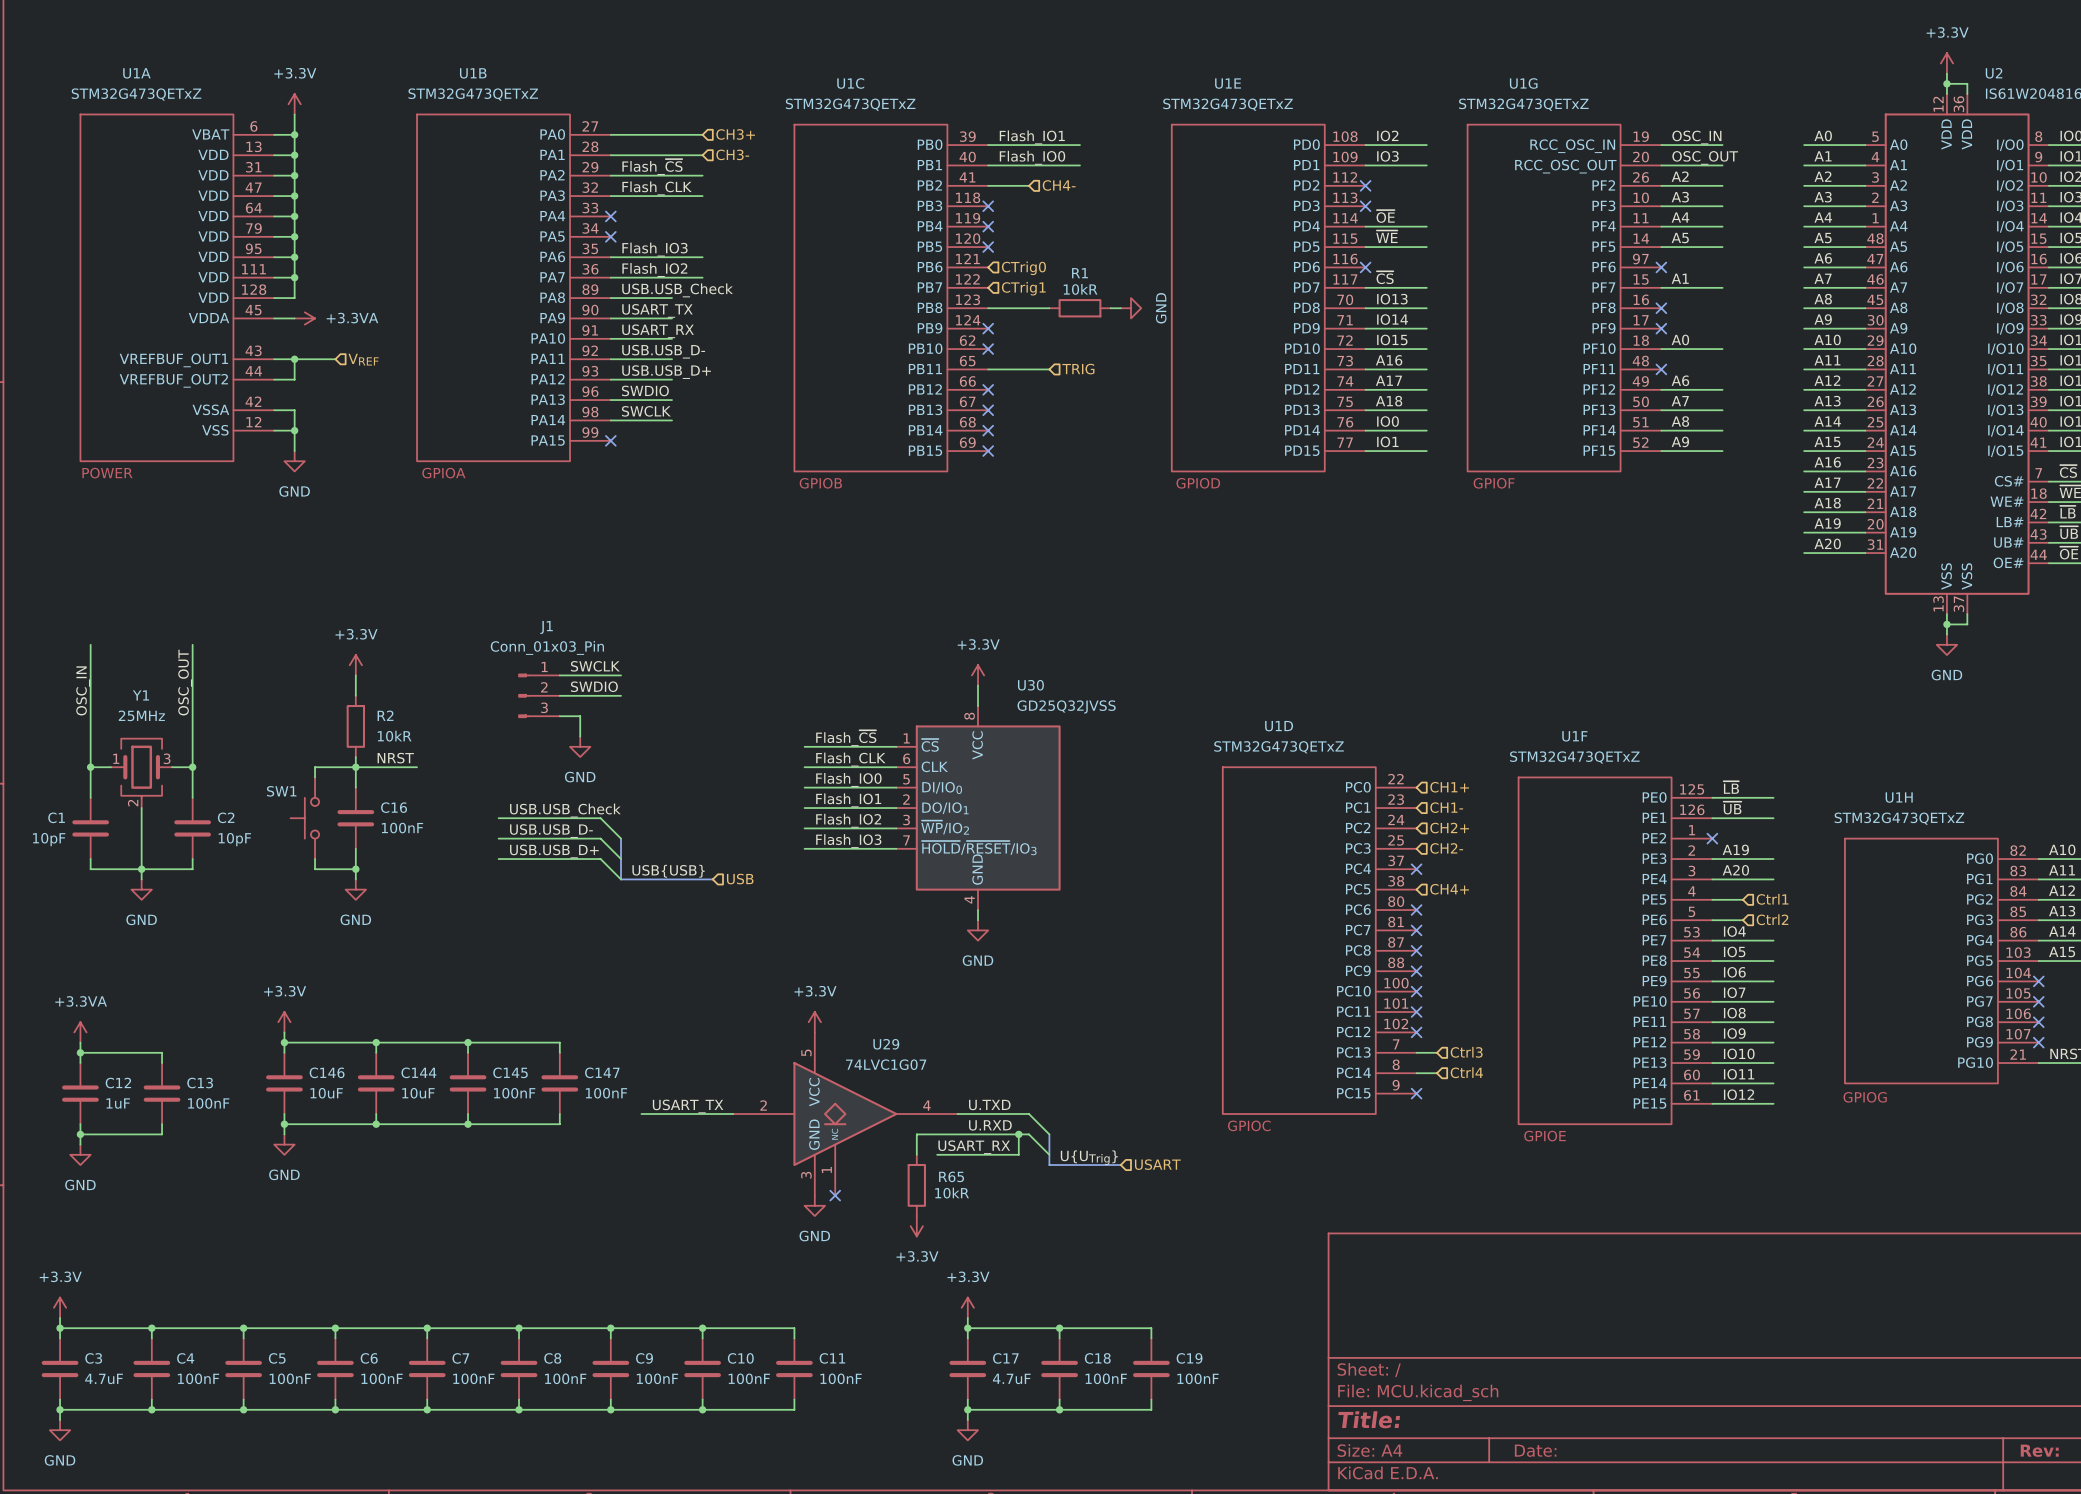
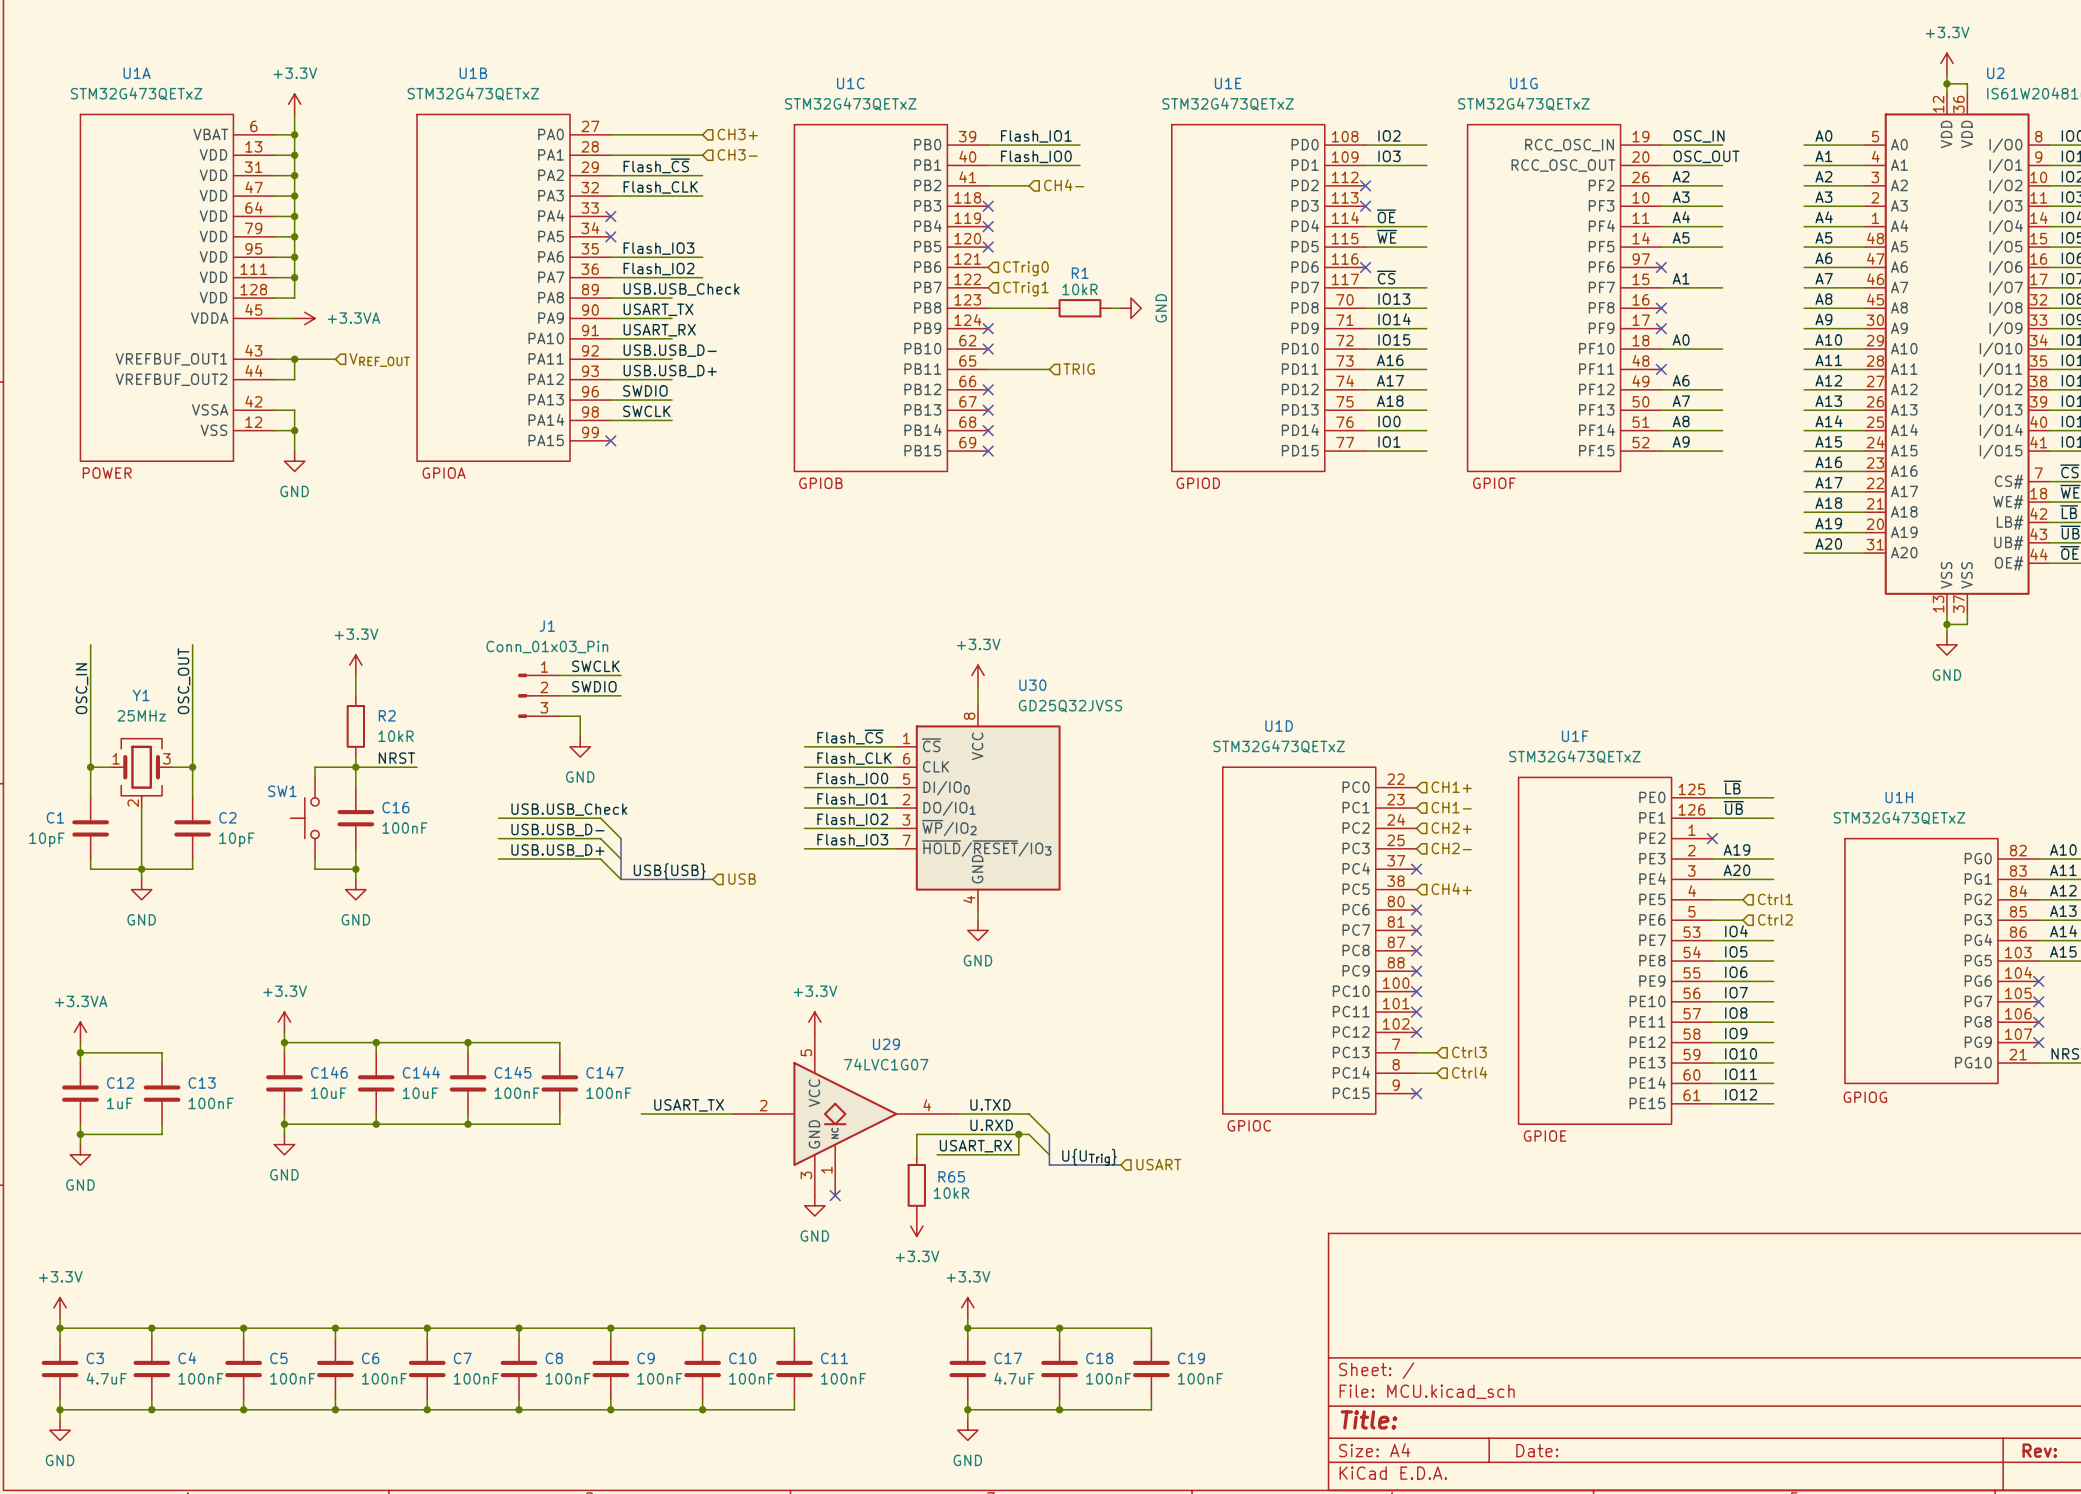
hierarchical label: VREF (363, 359) -> VREF_OUT (379, 360)

